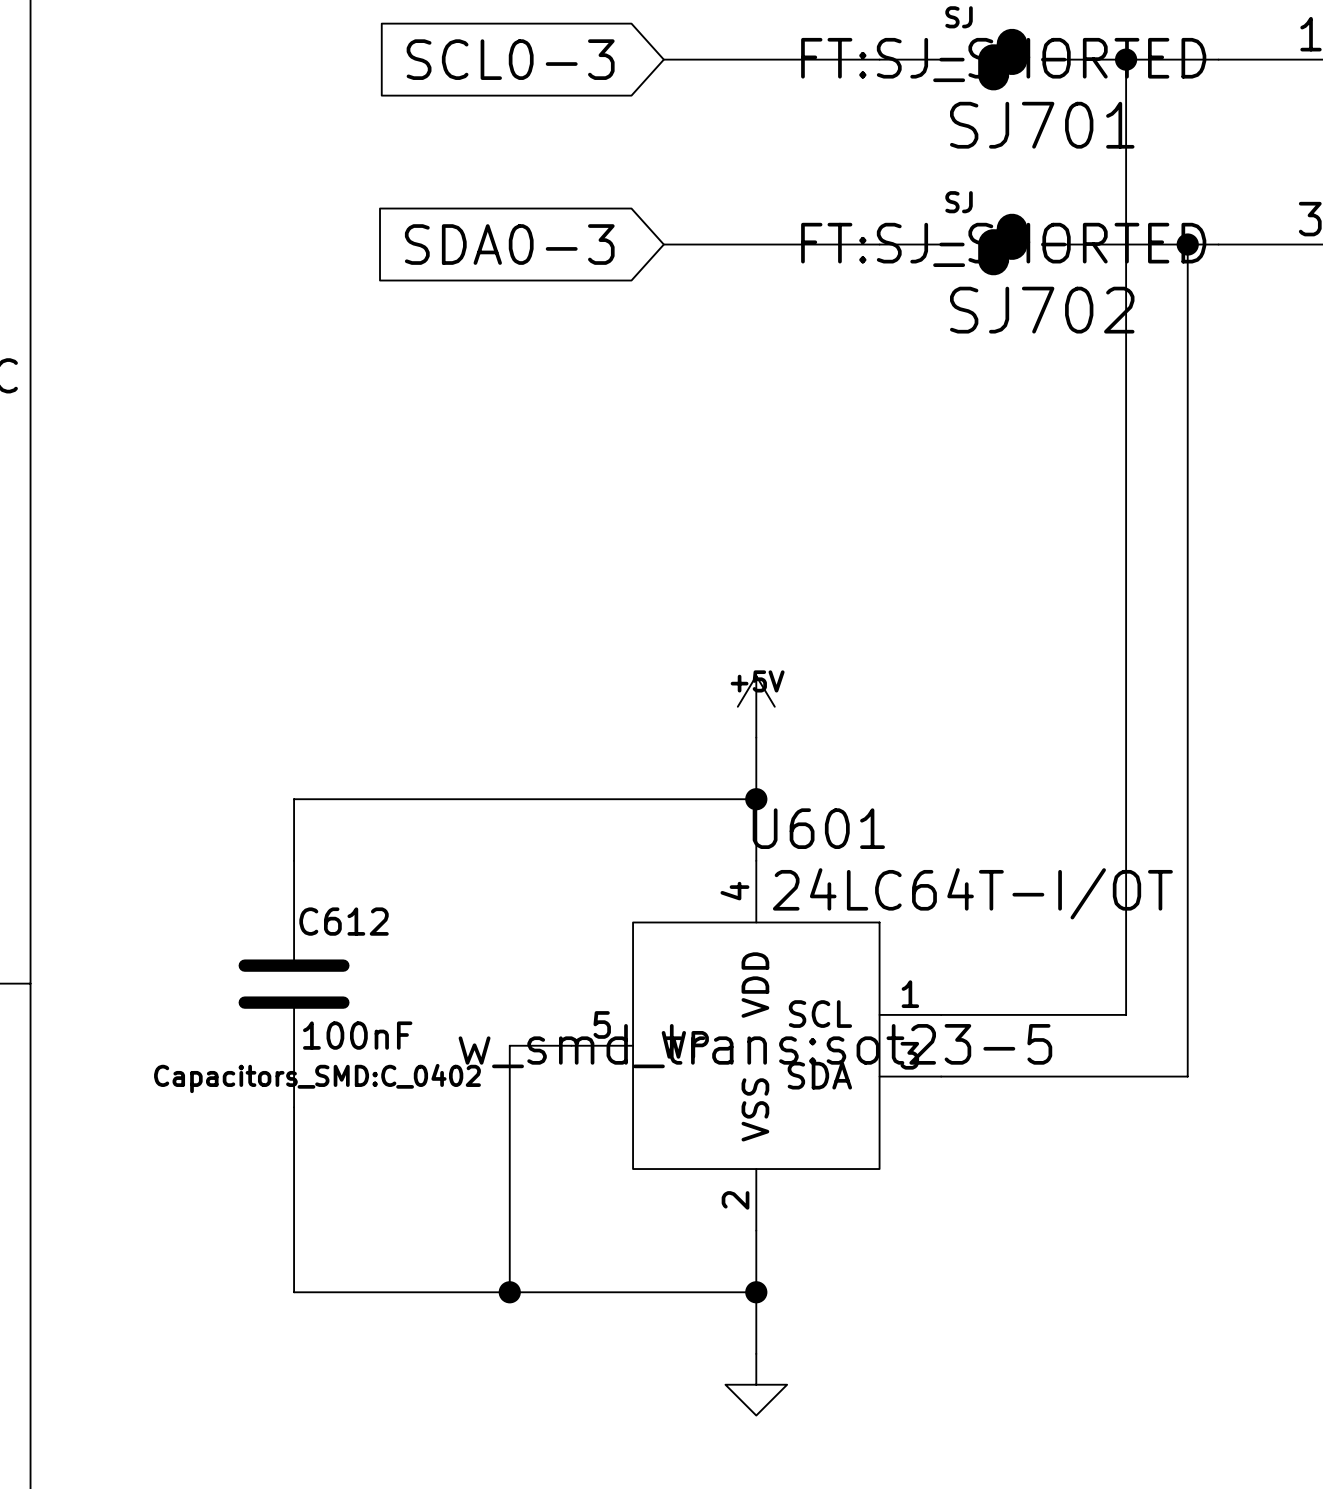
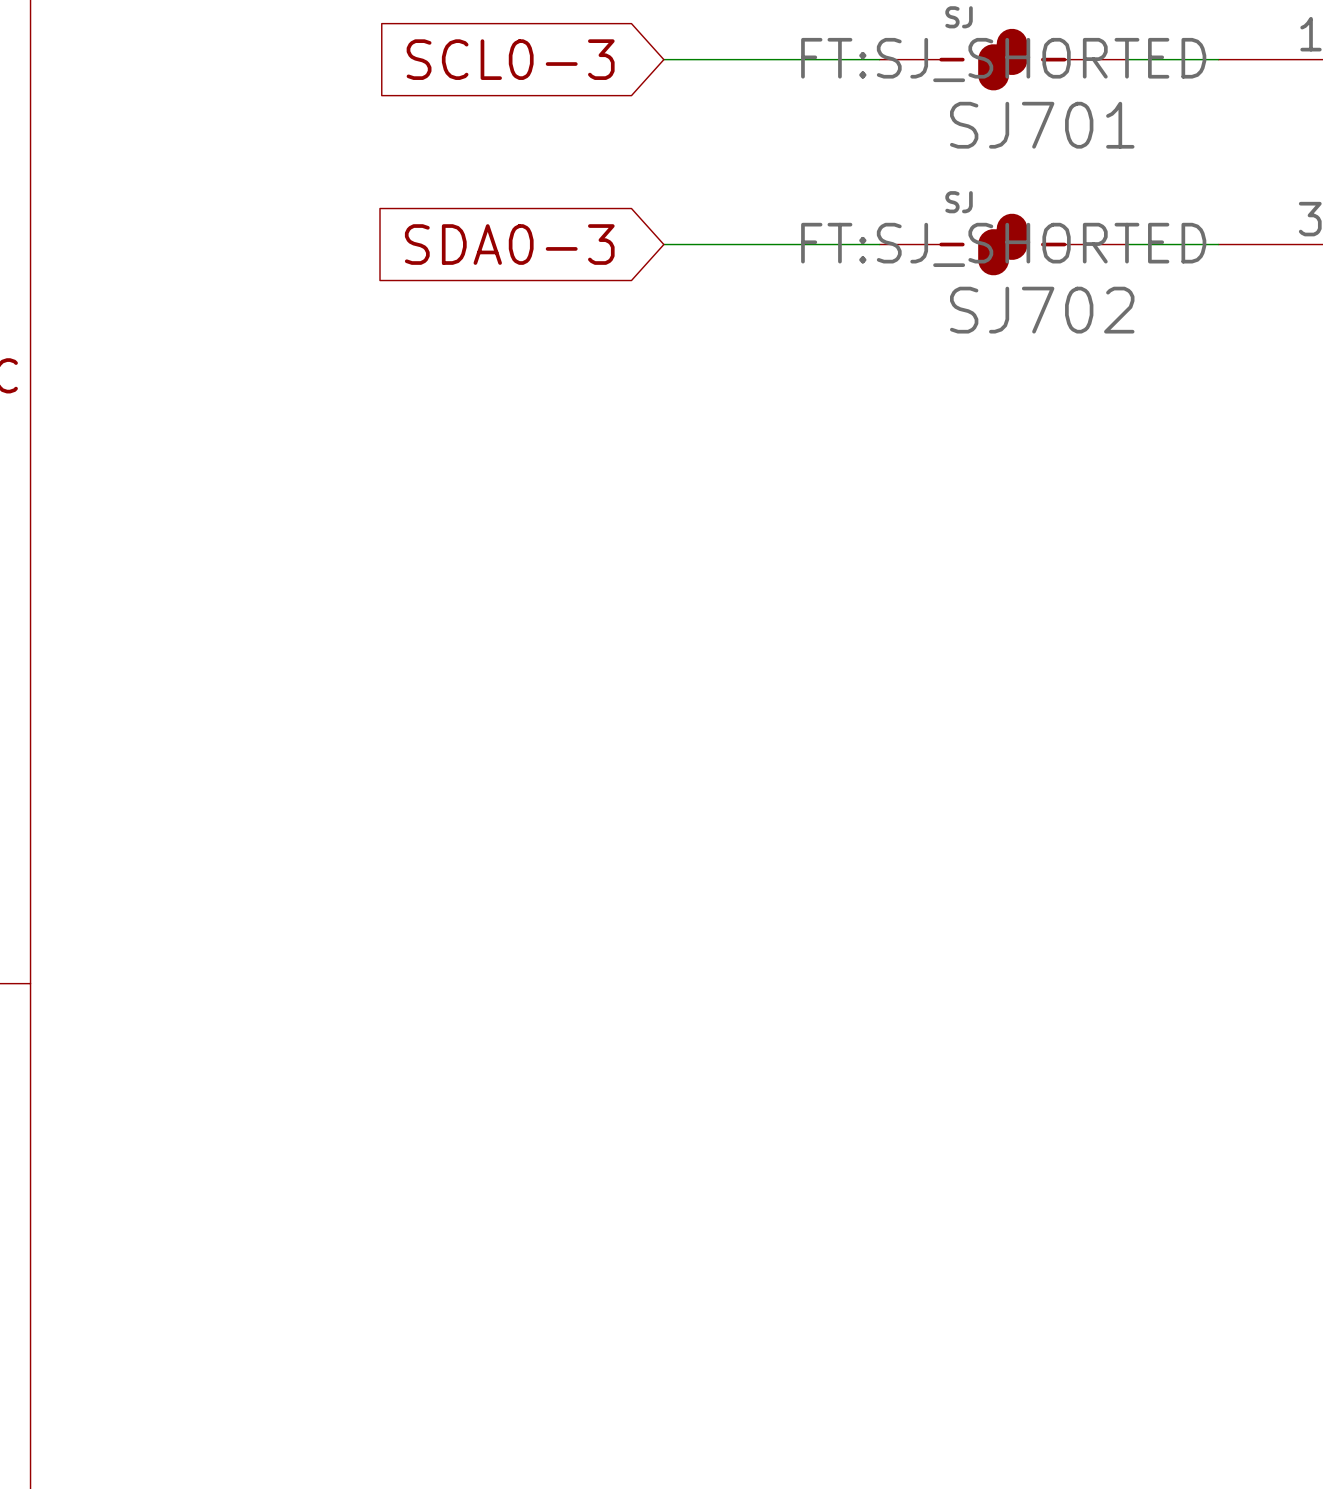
wire: (1126, 59) (1126, 1014) (941, 1014) -> none
junction: (1126, 59) -> none
wire: (1187, 244) (1187, 1076) (941, 1076) -> none
junction: (1187, 244) -> none
power symbol: +5V (756, 706) -> none
wire: (756, 737) (756, 860) -> none
wire: (756, 799) (294, 799) (294, 860) -> none
junction: (756, 799) -> none
C612: 100nF (294, 984) -> none
wire: (571, 1045) (509, 1045) (509, 1292) -> none
U601: 24LC64T-I/OT (756, 1045) -> none
wire: (294, 1107) (294, 1292) (756, 1292) -> none
wire: (756, 1230) (756, 1353) -> none
junction: (509, 1292) -> none
junction: (756, 1292) -> none
power symbol: (756, 1384) -> none

